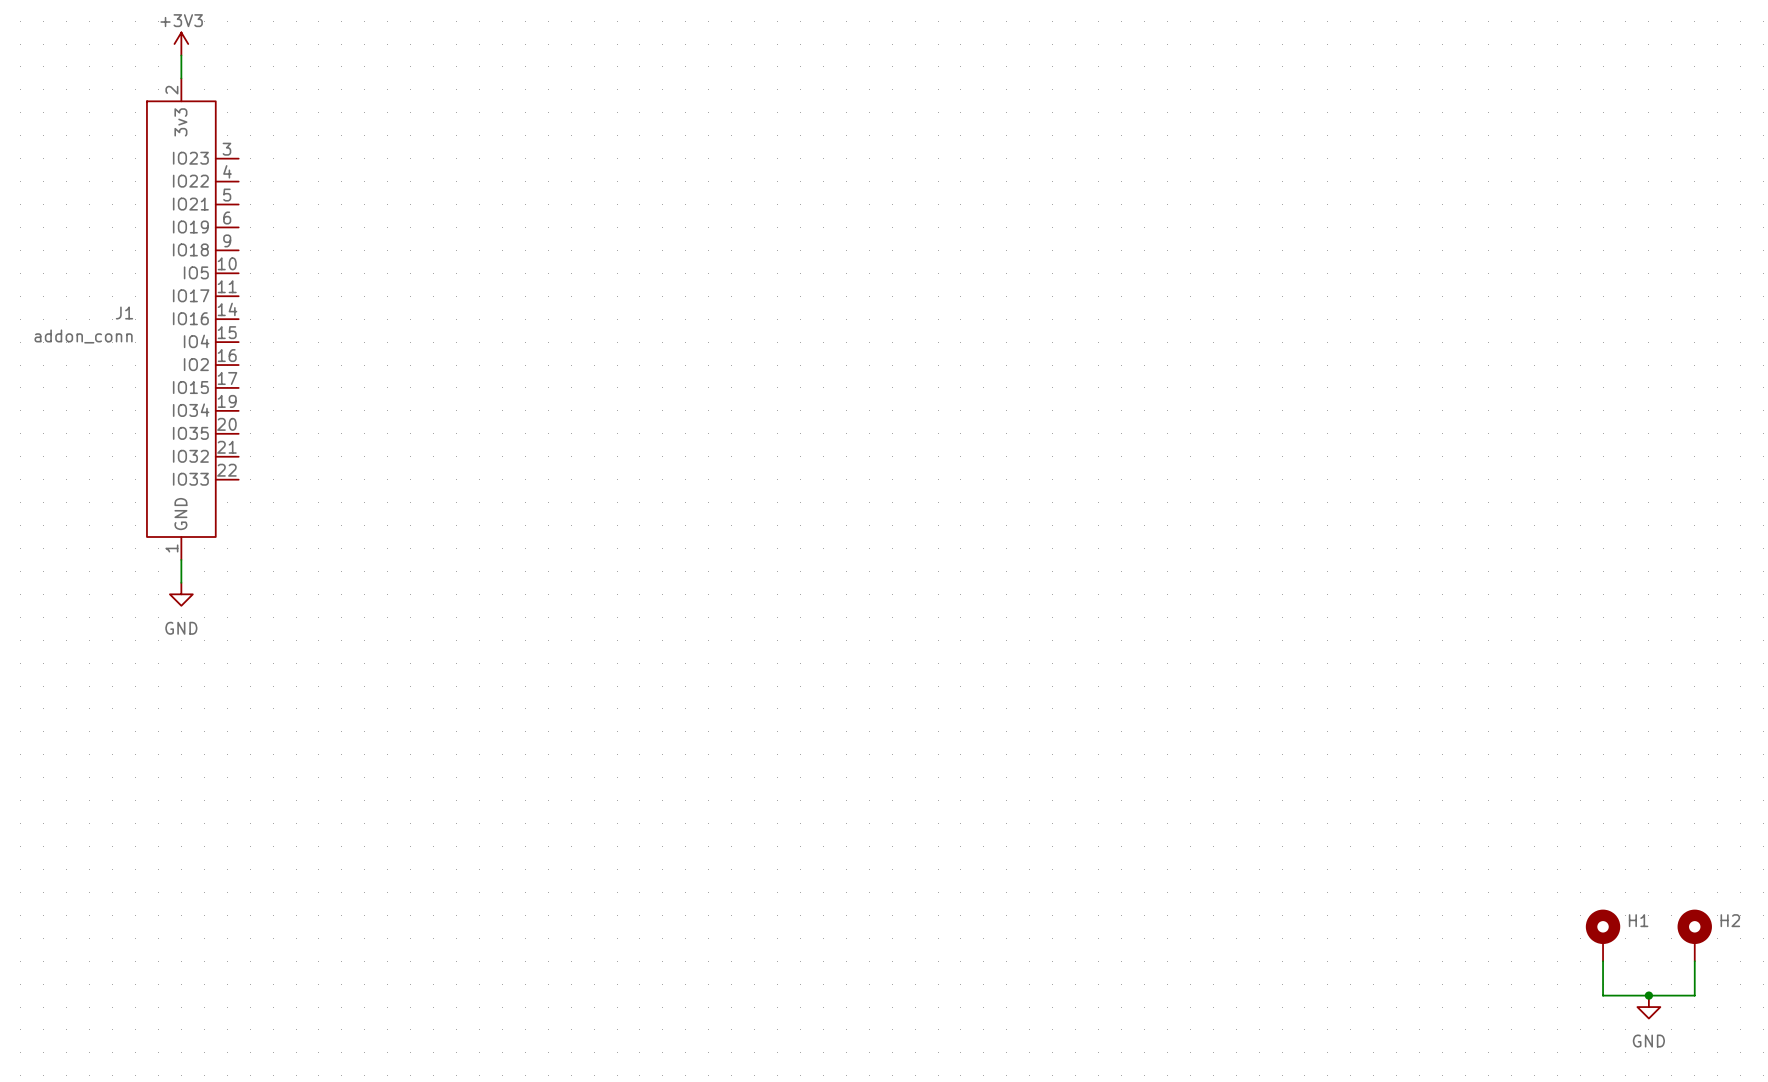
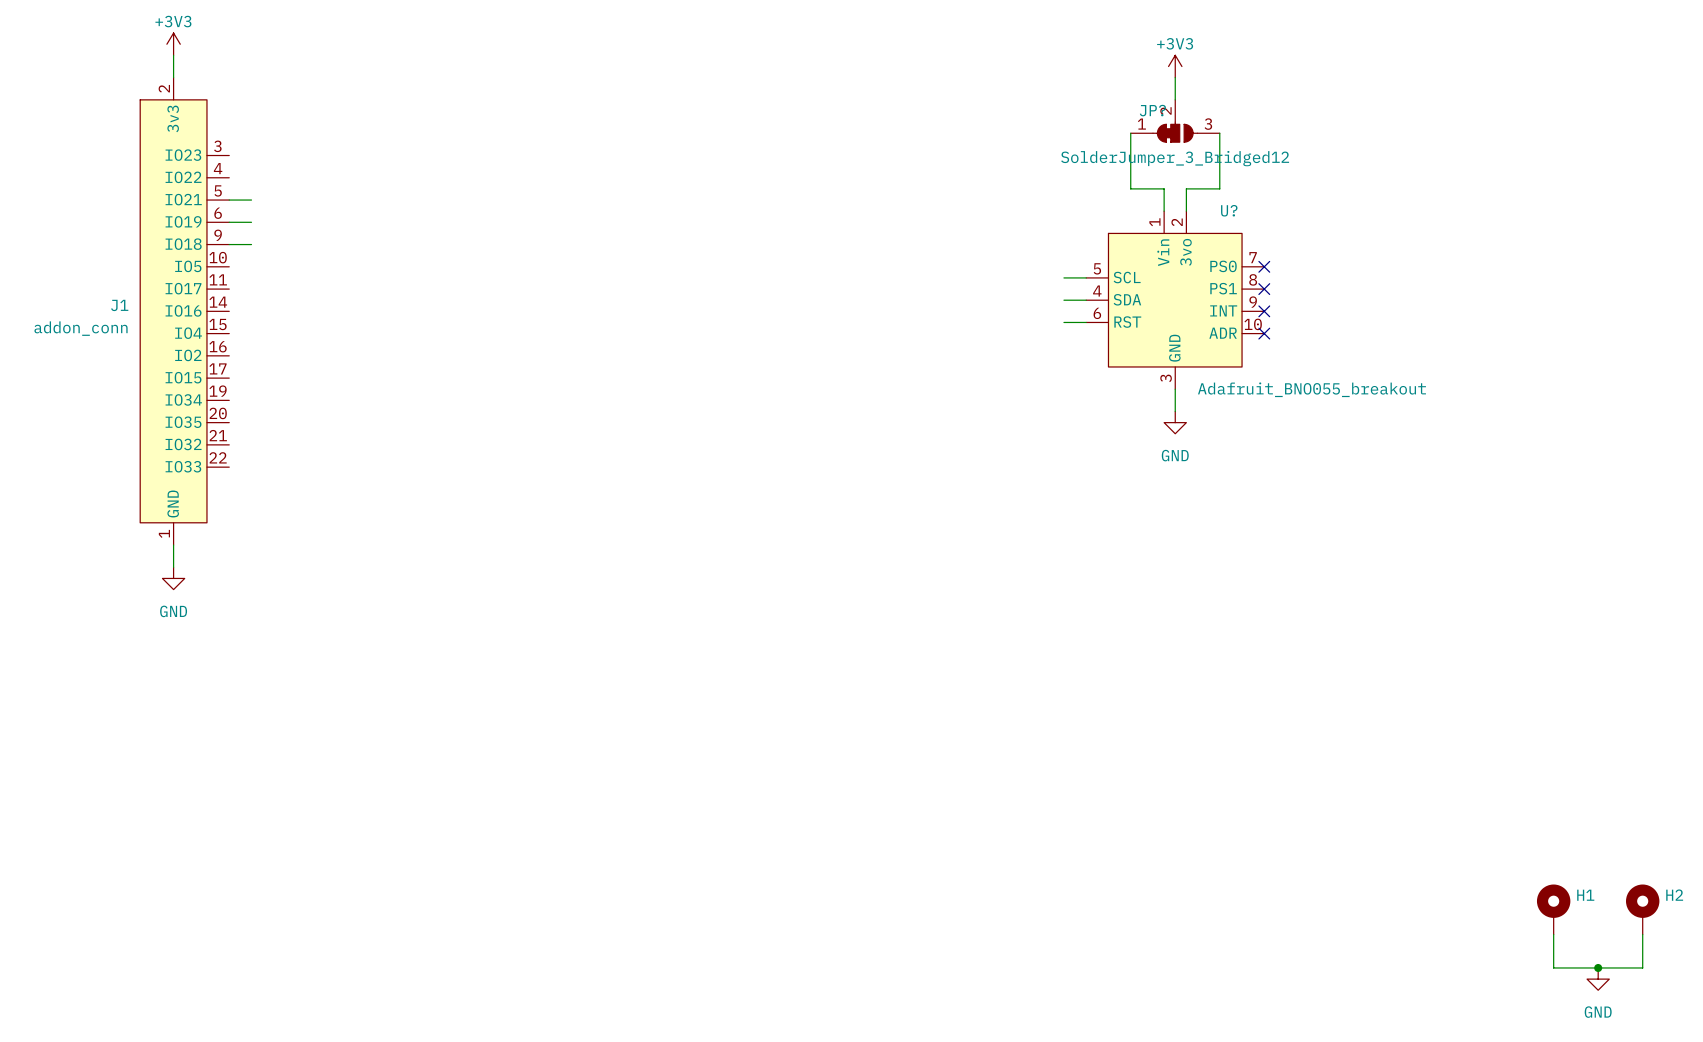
power symbol: none -> +3V3 (1175, 66)
wire: none -> (1175, 77) (1175, 99)
JP?: none -> SolderJumper_3_Bridged12 (1175, 121)
wire: none -> (1130, 133) (1130, 188) (1164, 188) (1164, 211)
wire: none -> (1219, 133) (1219, 188) (1186, 188) (1186, 211)
wire: none -> (229, 200) (251, 200)
wire: none -> (229, 222) (251, 222)
wire: none -> (229, 244) (251, 244)
no-connect mark: none -> (1264, 266)
wire: none -> (1063, 277) (1086, 277)
no-connect mark: none -> (1264, 289)
wire: none -> (1063, 300) (1086, 300)
U?: none -> Adafruit_BNO055_breakout (1175, 300)
no-connect mark: none -> (1264, 311)
wire: none -> (1063, 322) (1086, 322)
no-connect mark: none -> (1264, 333)
wire: none -> (1175, 389) (1175, 411)
power symbol: none -> GND (1175, 422)

